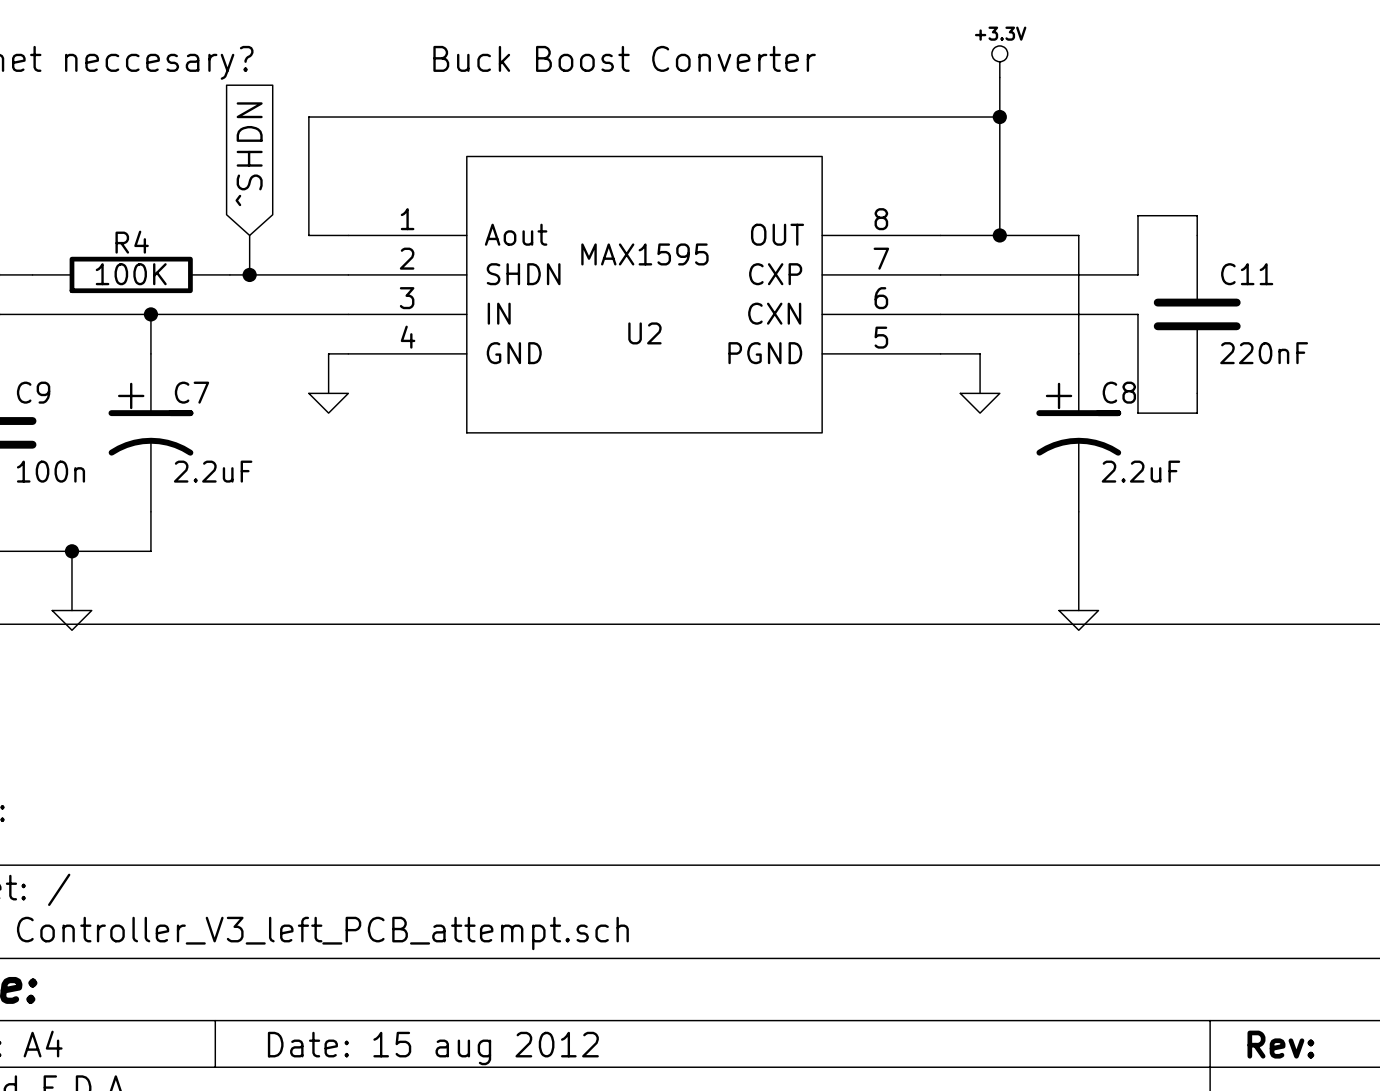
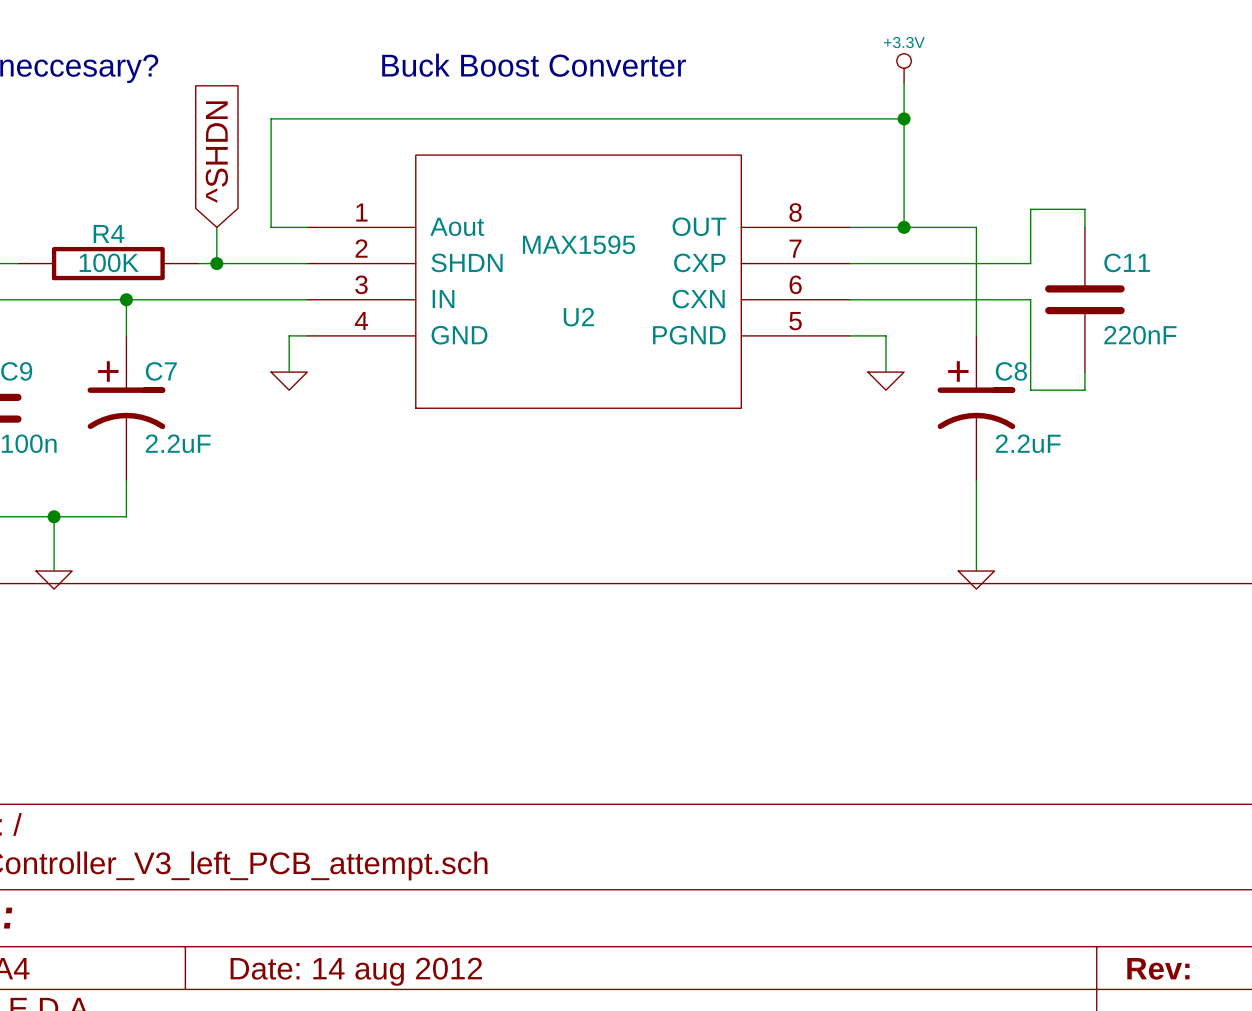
title block: Date: 15 aug 2012 (433, 1048) -> Date: 14 aug 2012 (356, 971)

